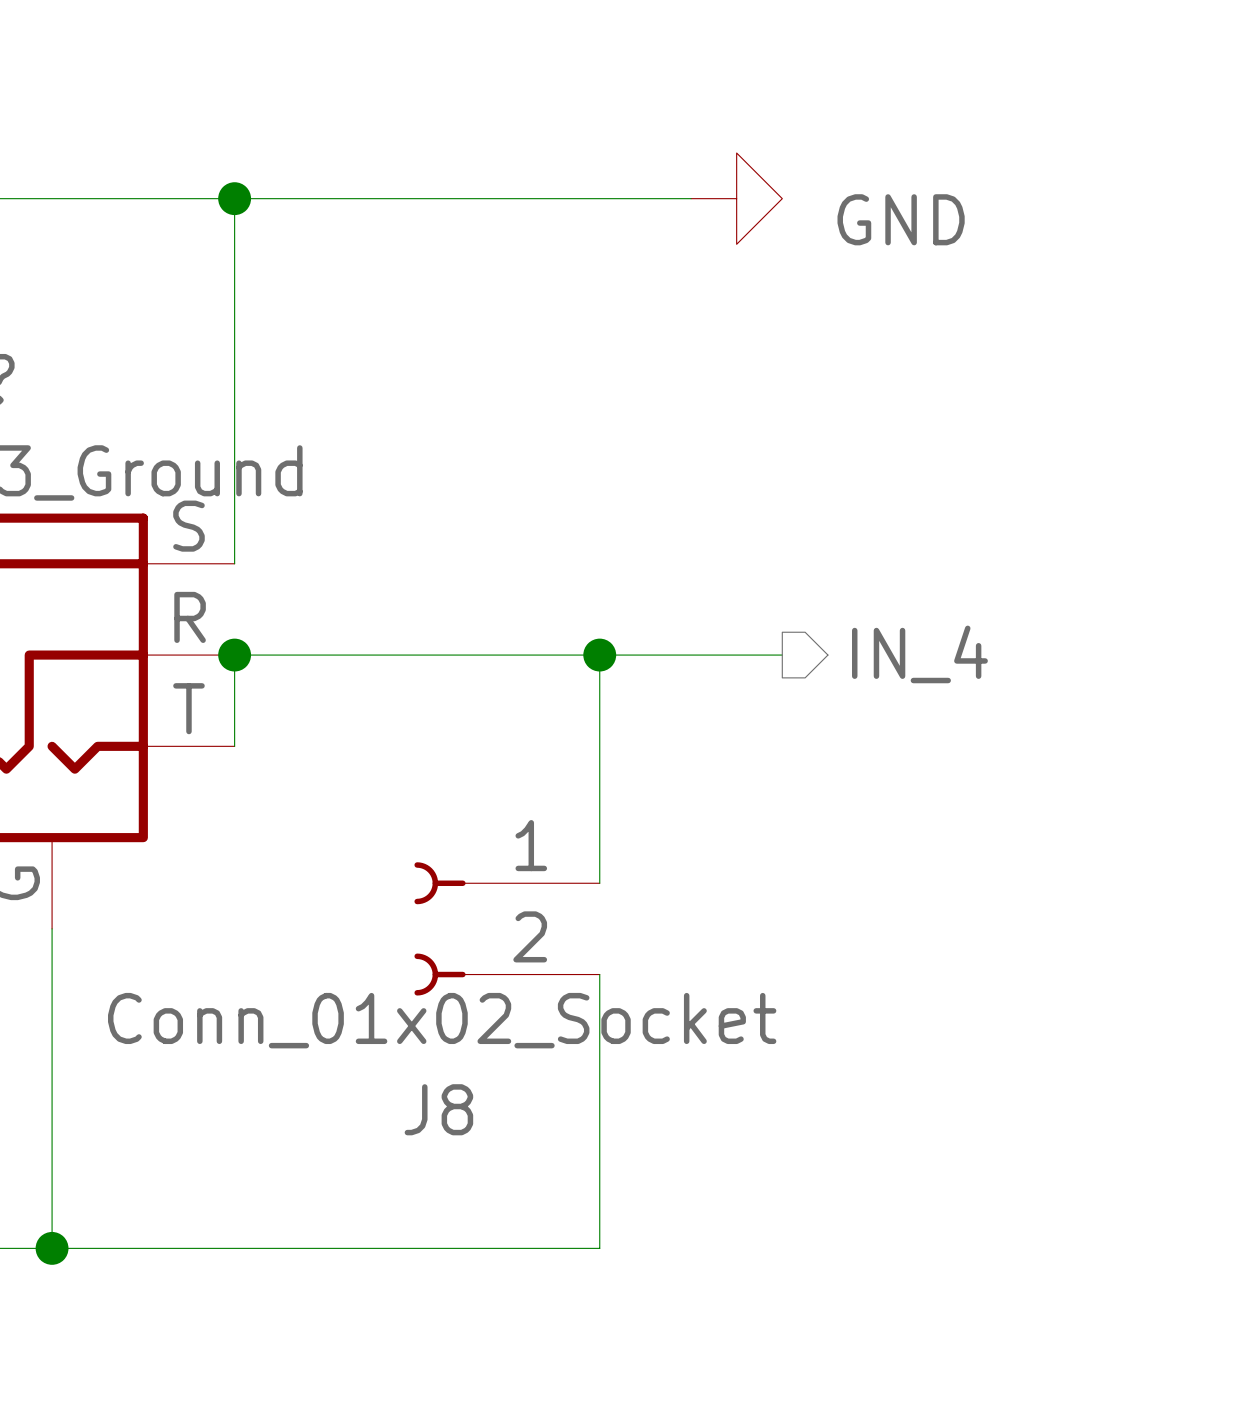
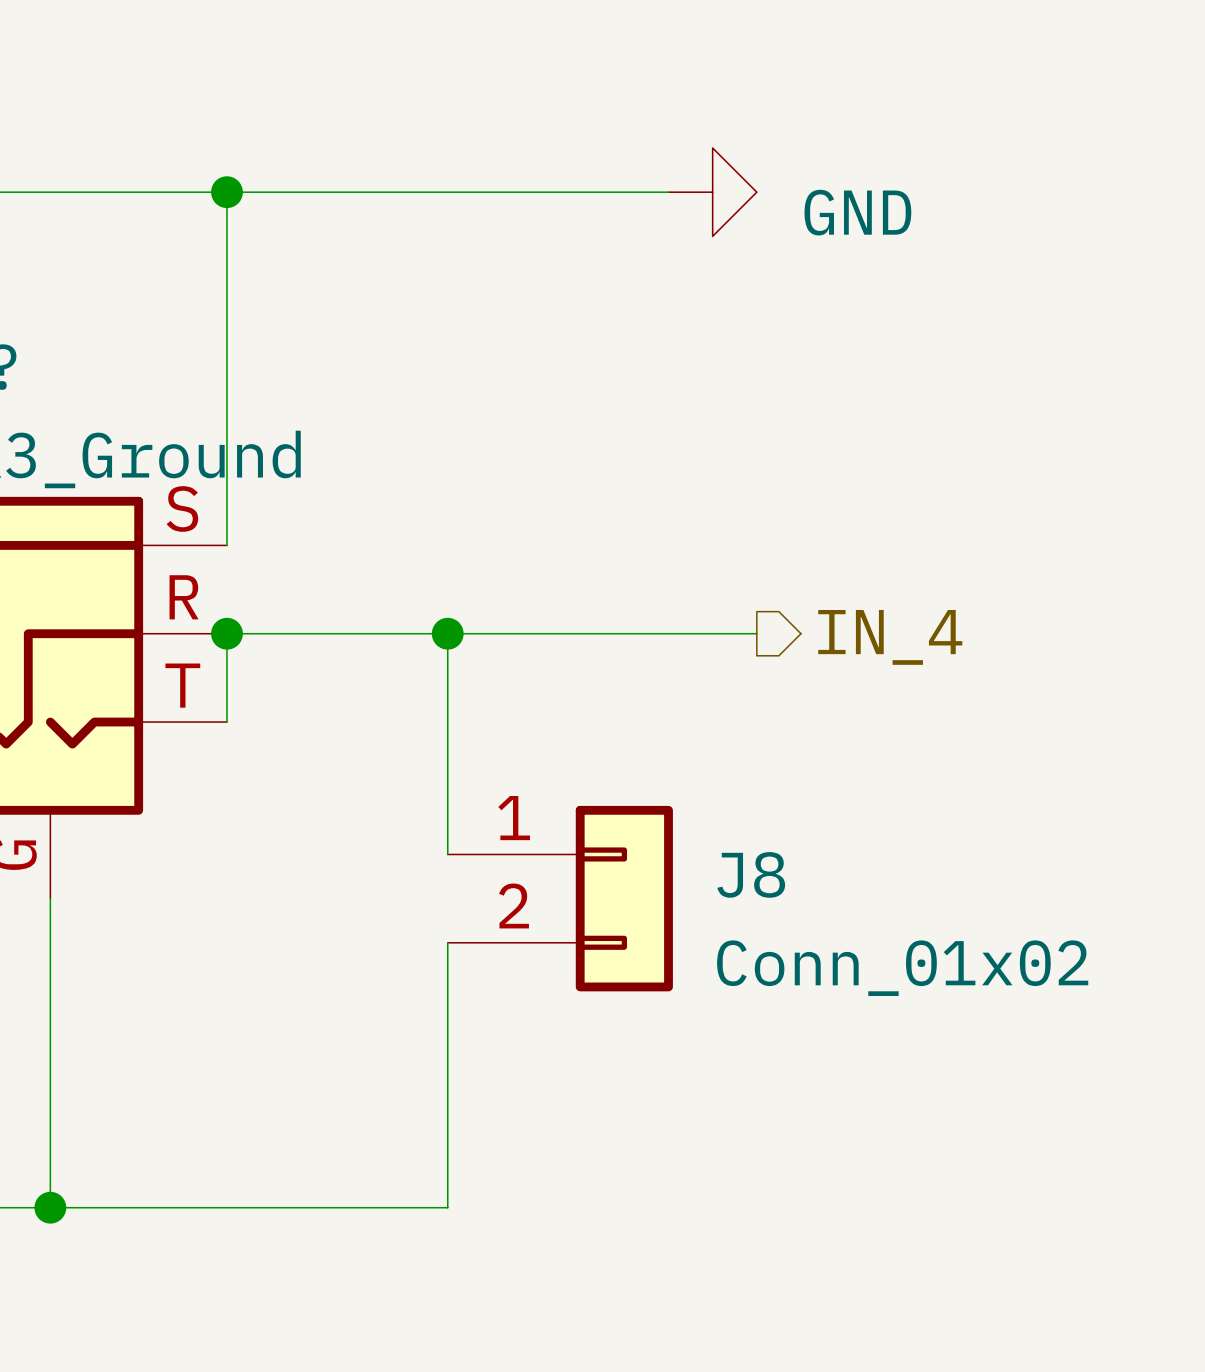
wire: (599, 655) (599, 883) -> (447, 633) (447, 854)
junction position: (599, 655) -> (447, 633)
J8 symbol: [414, 862, 600, 996] -> [447, 805, 673, 992]
wire: (599, 974) (599, 1248) (462, 1248) -> (447, 942) (447, 1207)
J8 value: Conn_01x02_Socket (442, 1020) -> Conn_01x02 (902, 968)
J8 name position: J8 (438, 1109) -> J8 (751, 874)

